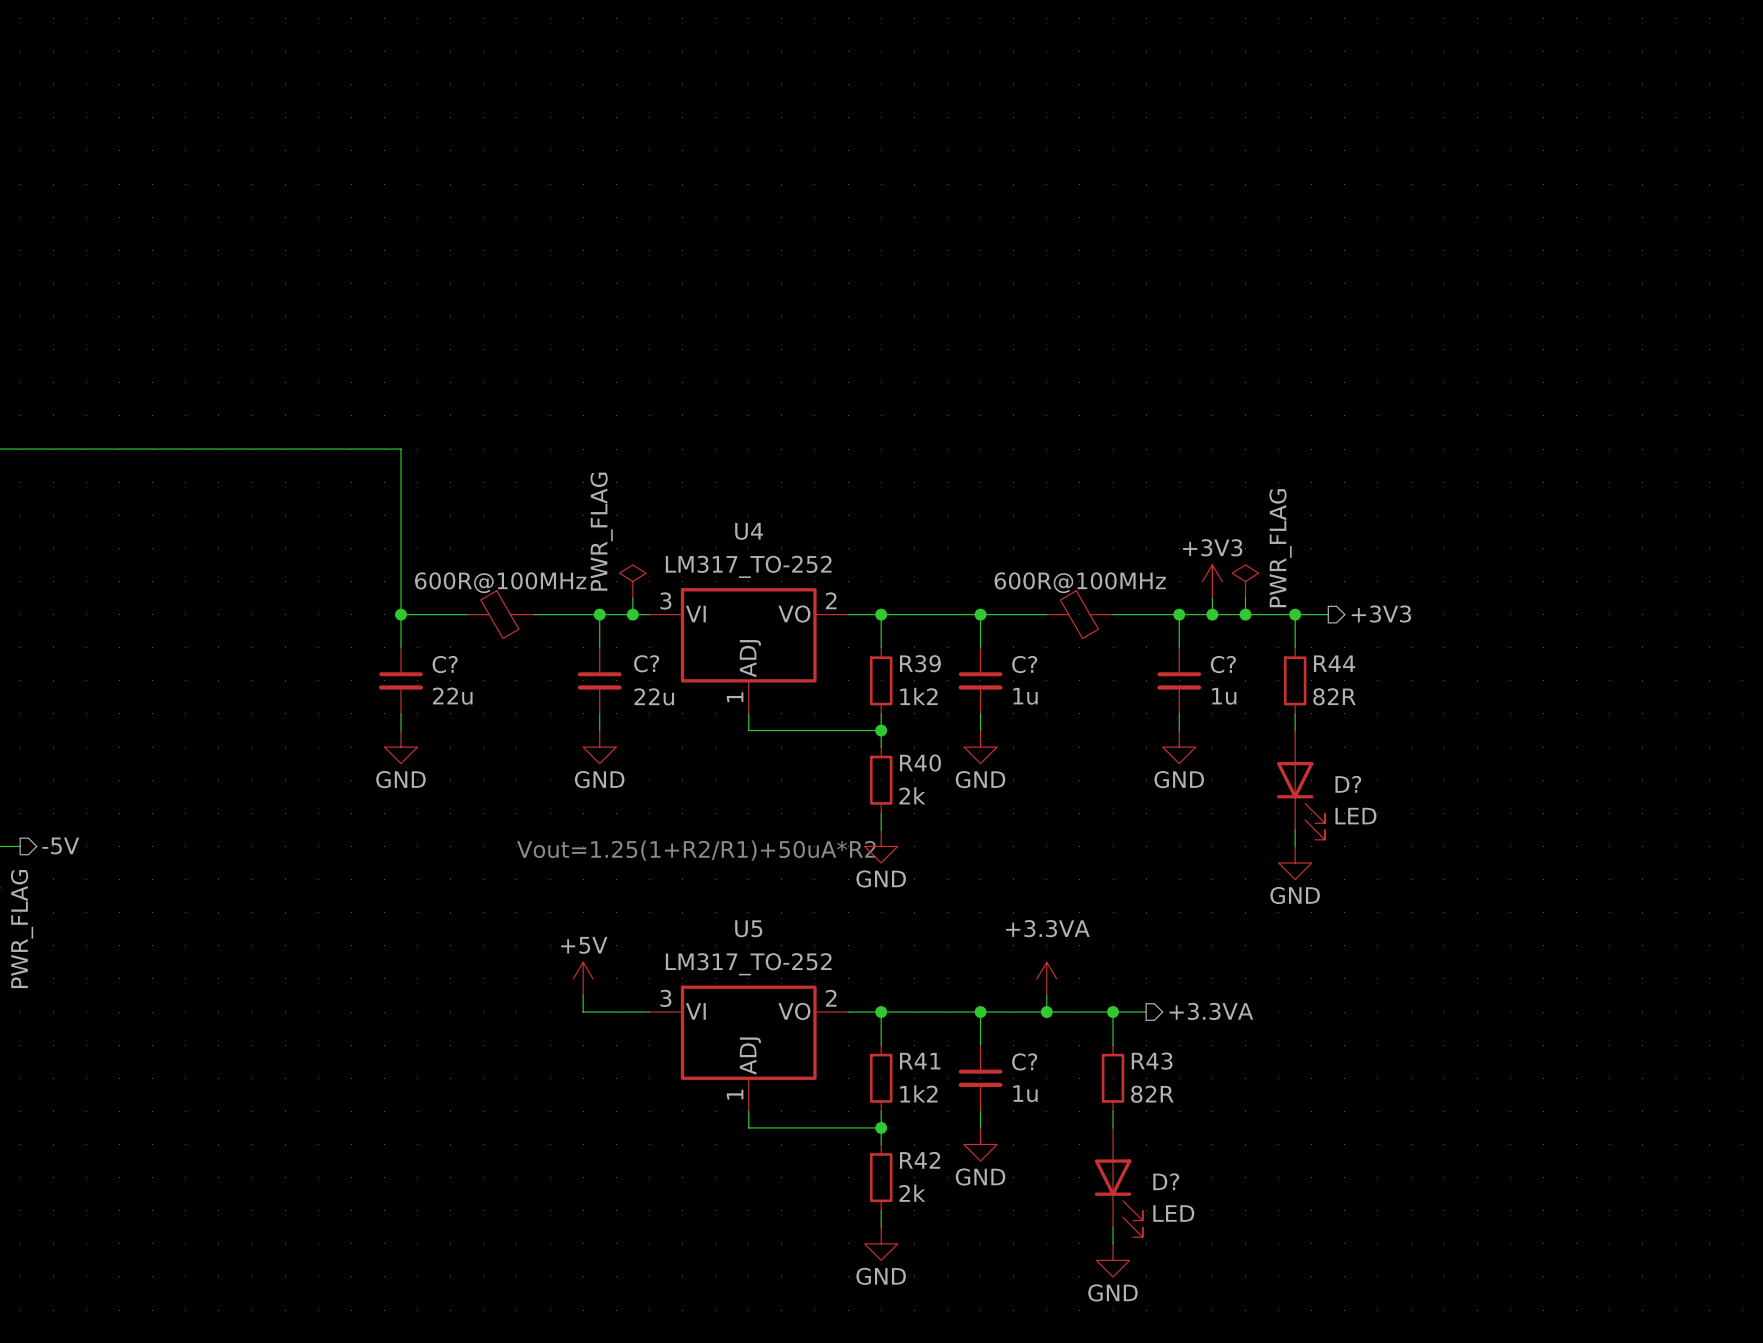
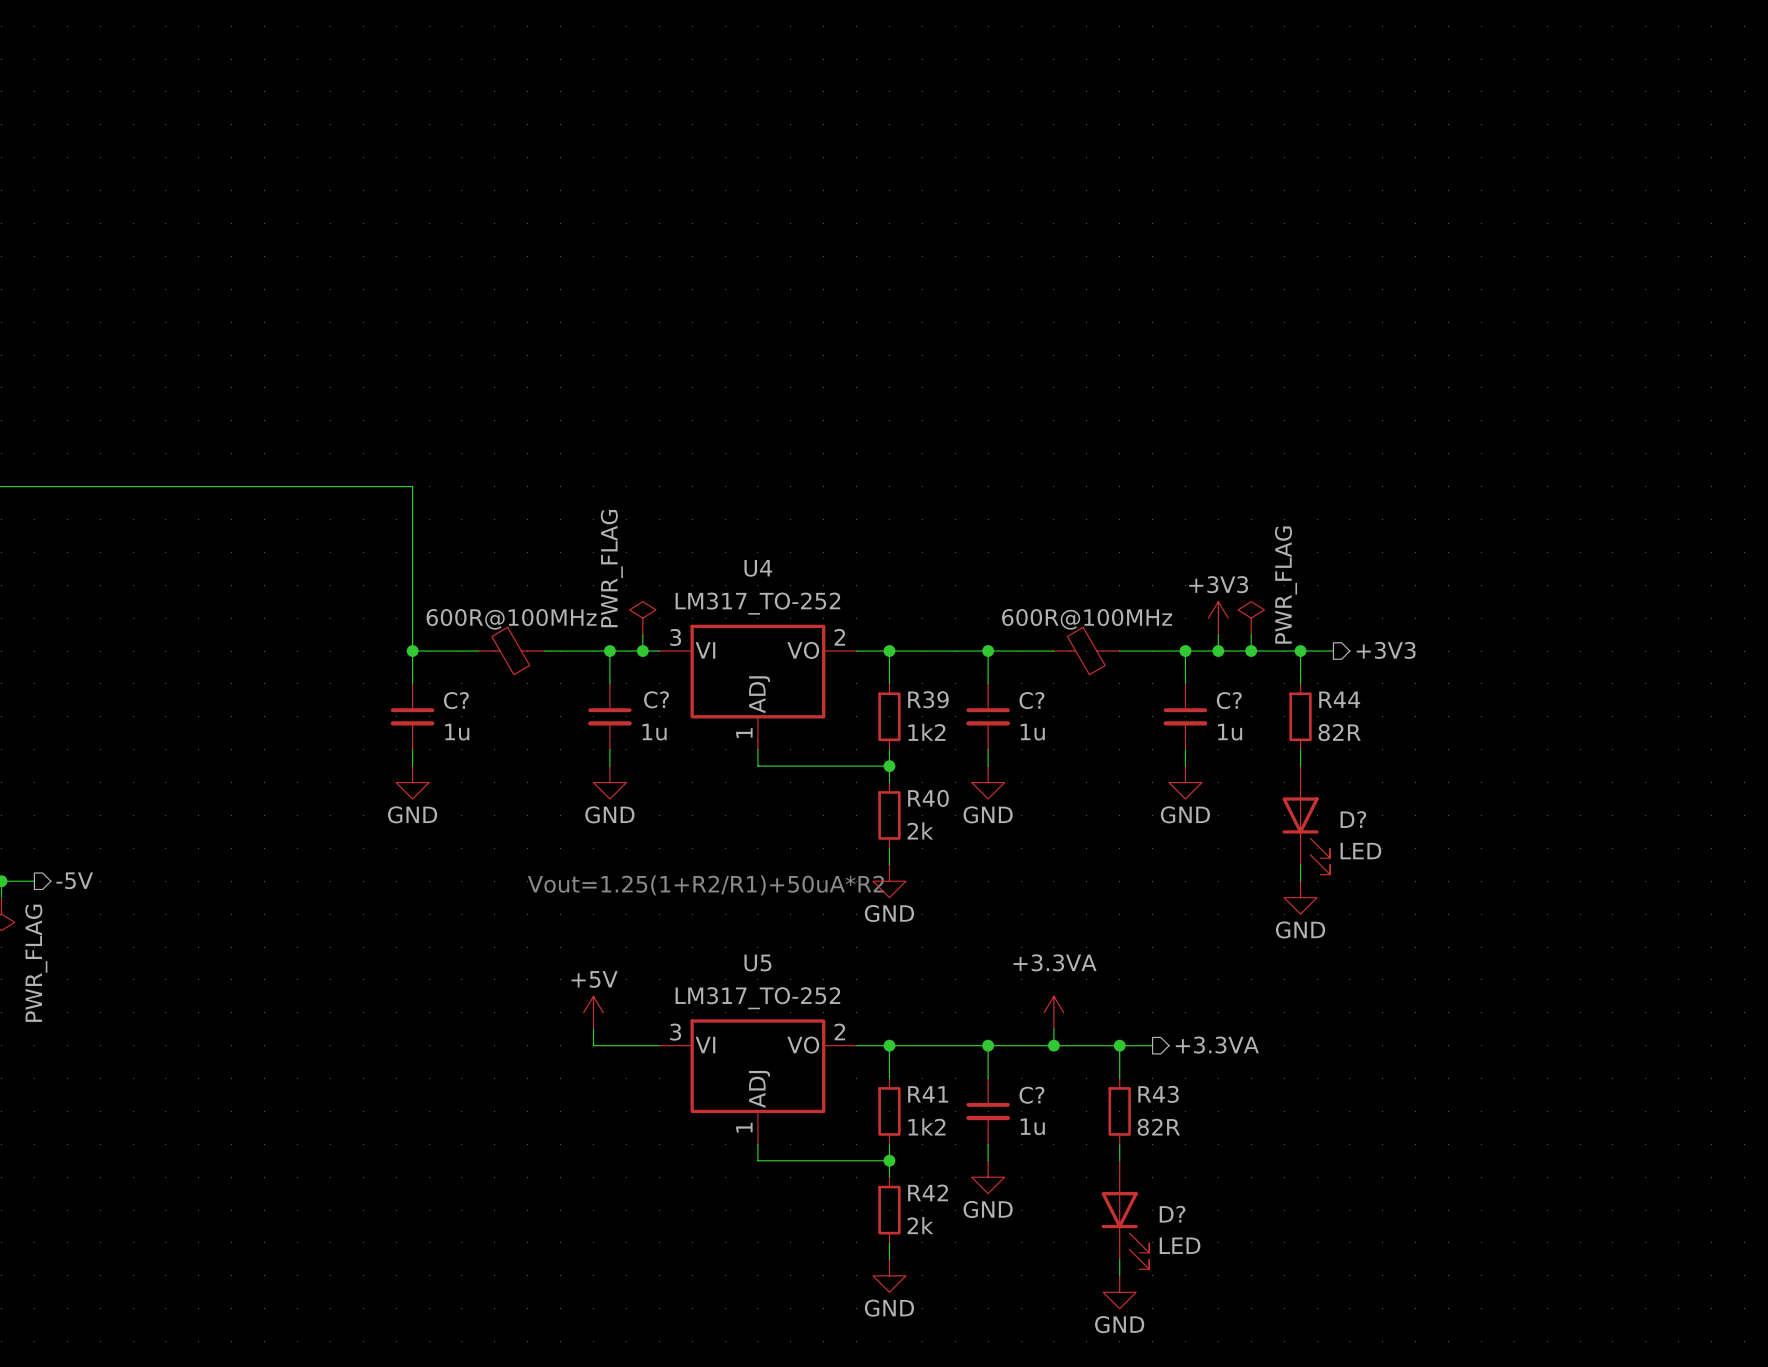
C? value: 22u (452, 696) -> 1u (457, 732)
C? value: 22u (654, 696) -> 1u (654, 732)

